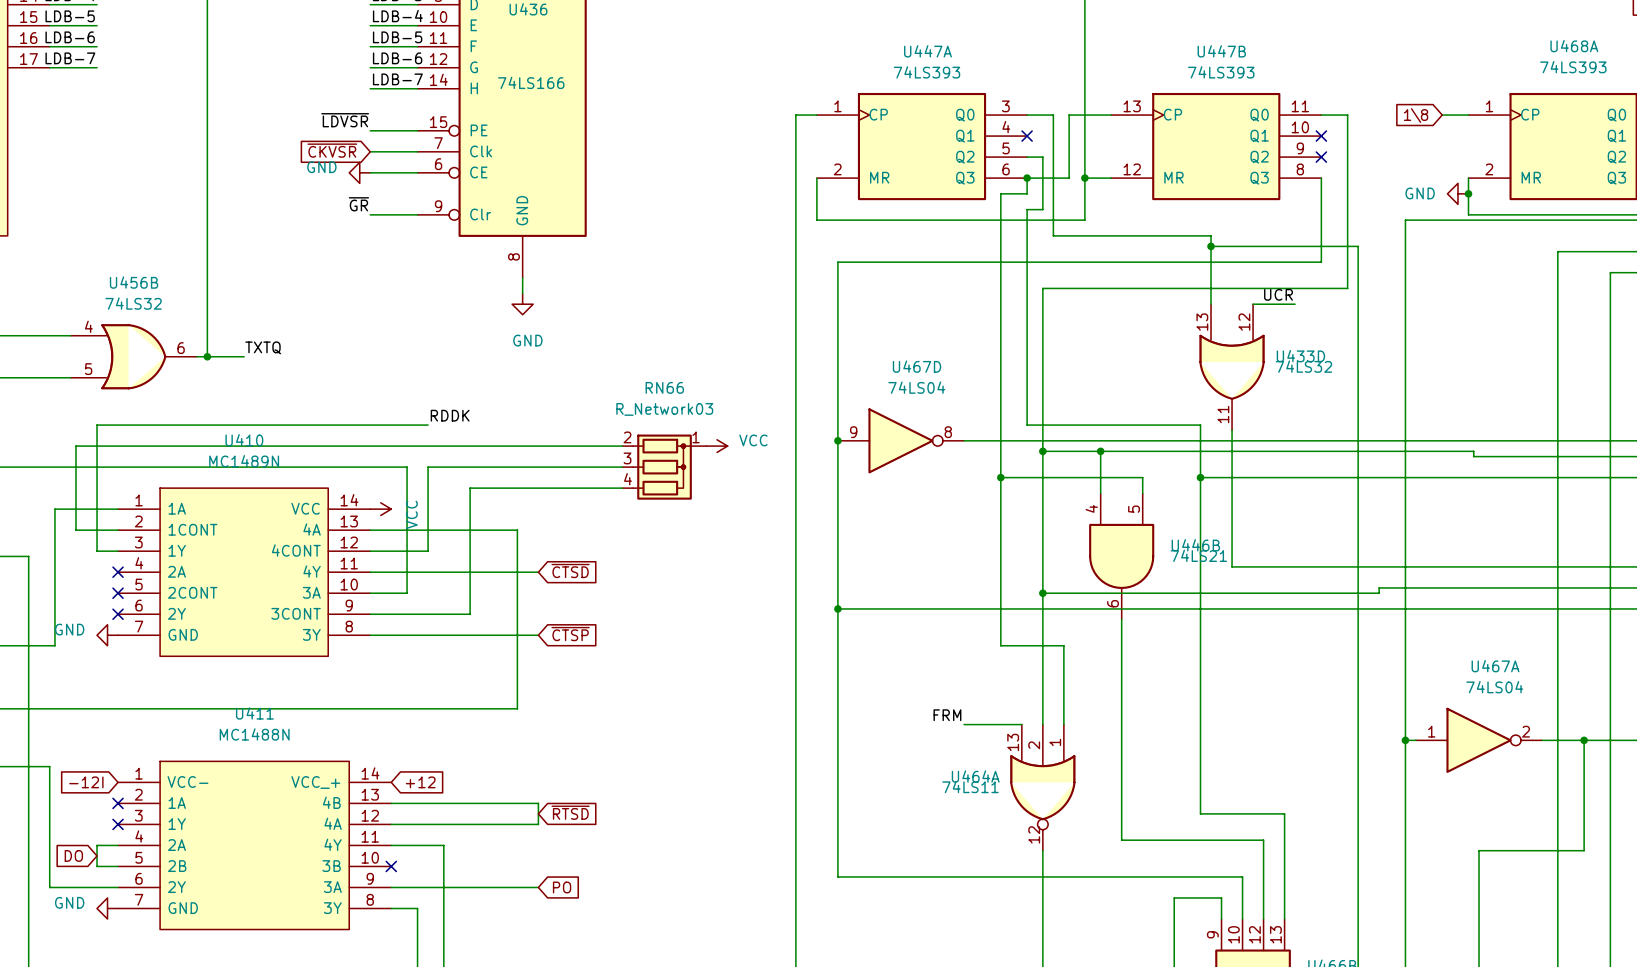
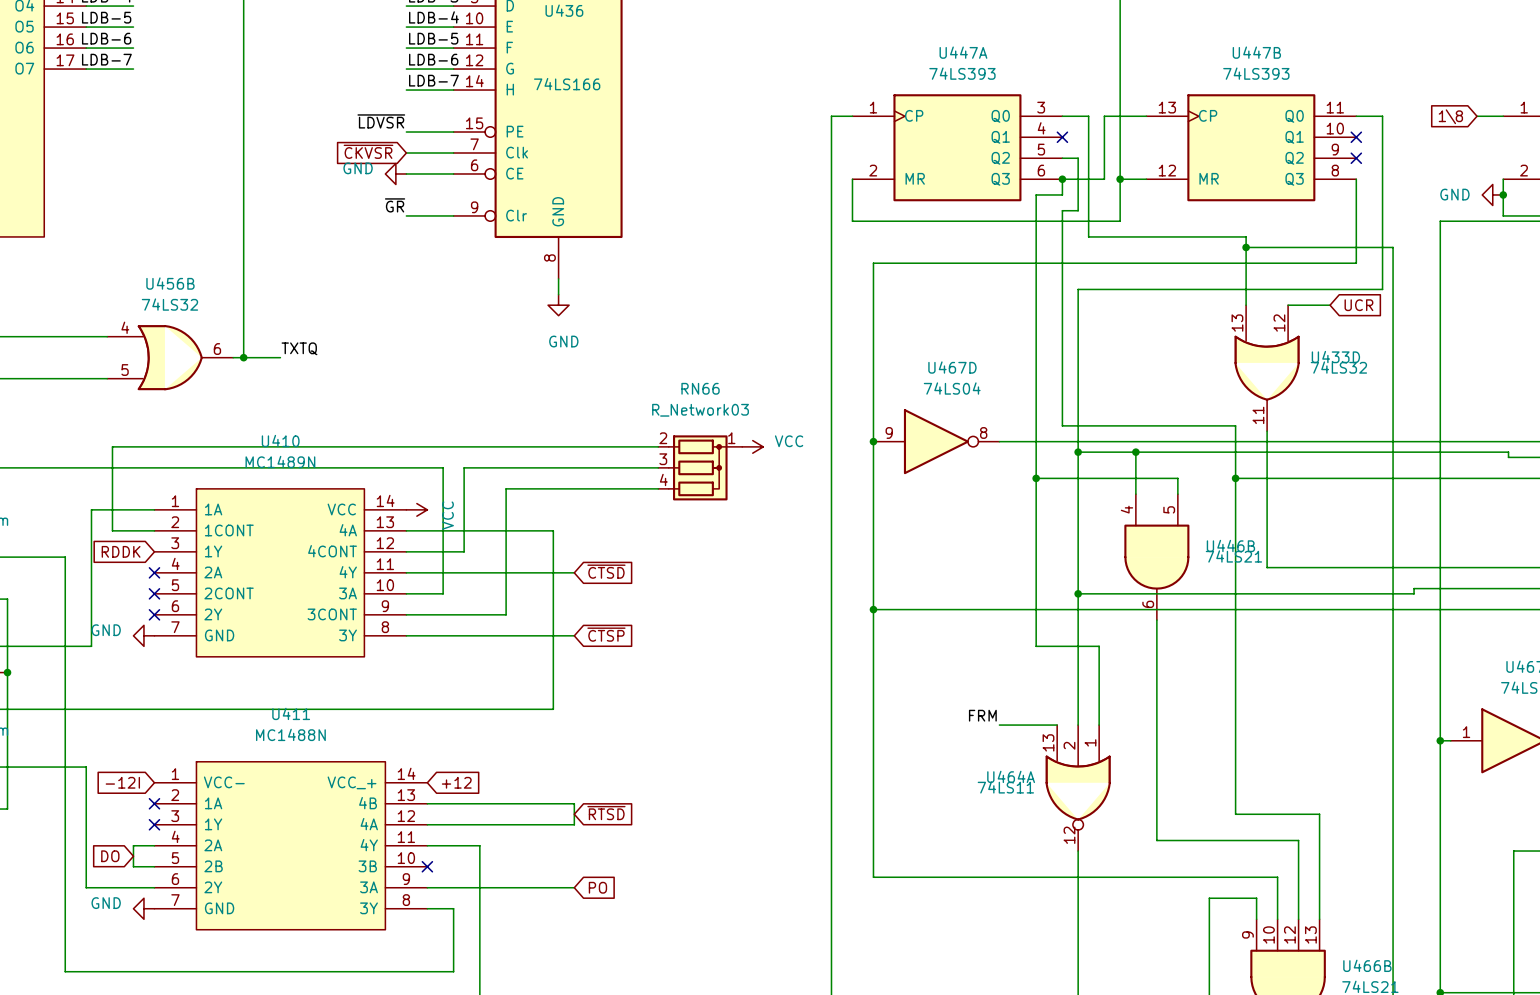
label: UCR (1278, 294) -> none
global label: none -> UCR (1358, 305)
label: RDDK (450, 415) -> none
wire: (428, 425) (97, 425) (97, 551) (118, 551) -> none
global label: none -> RDDK (121, 551)

